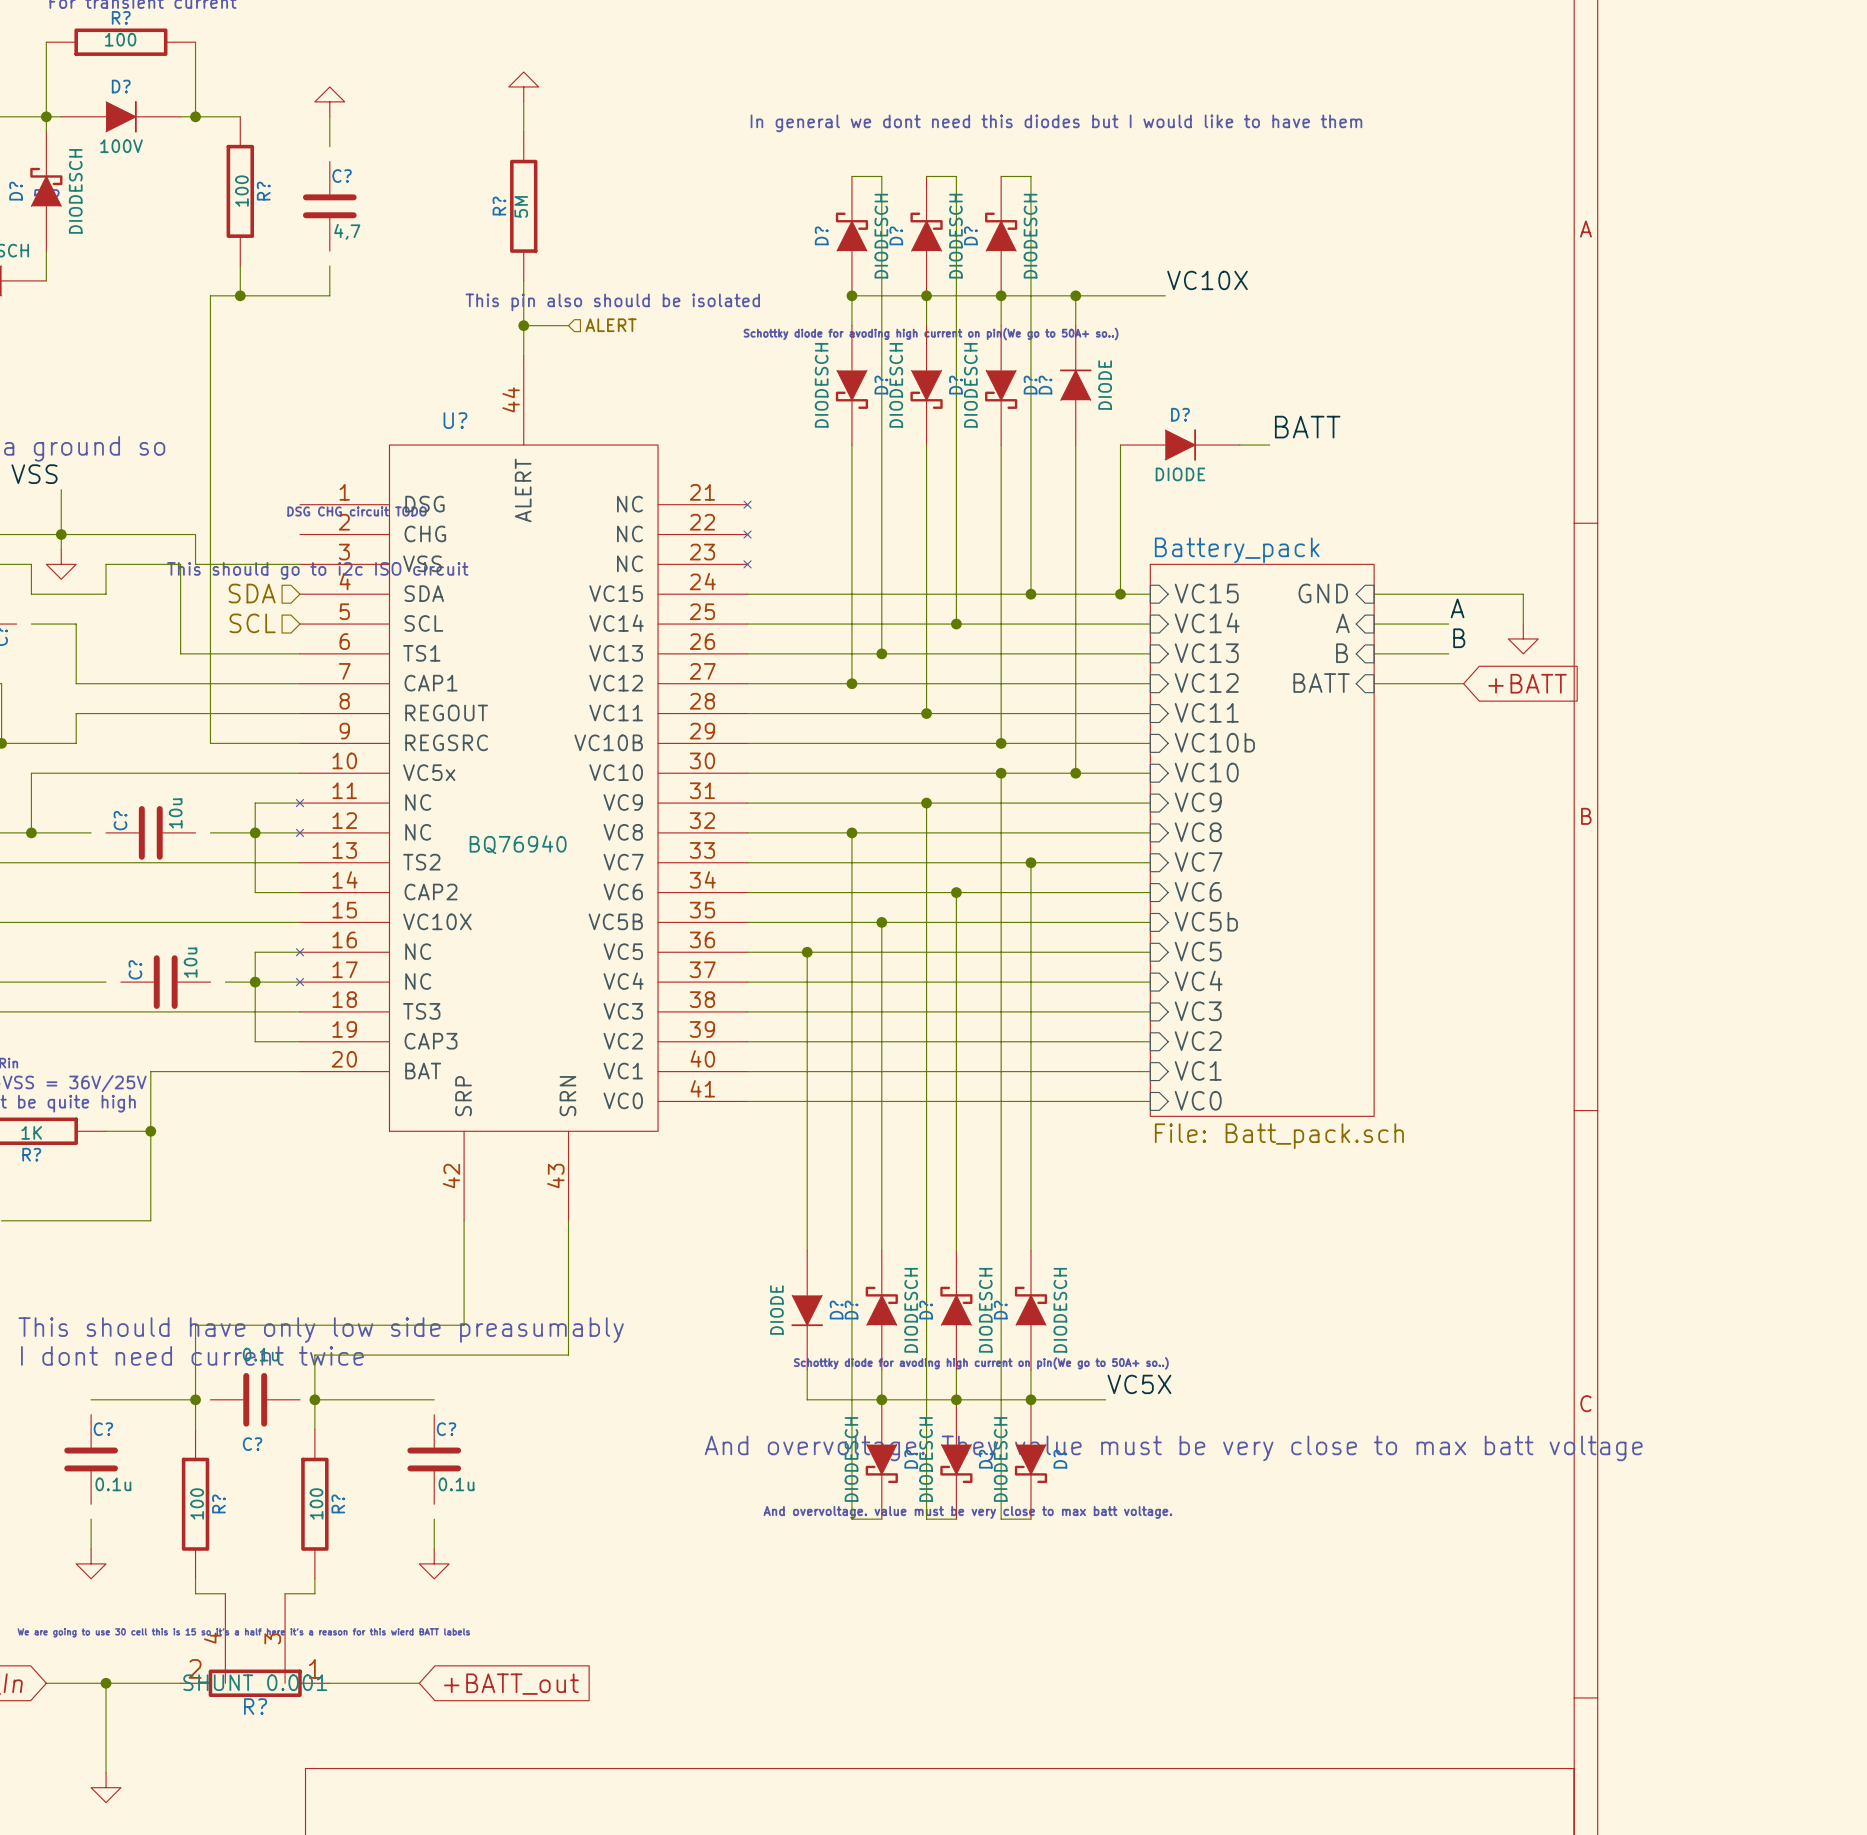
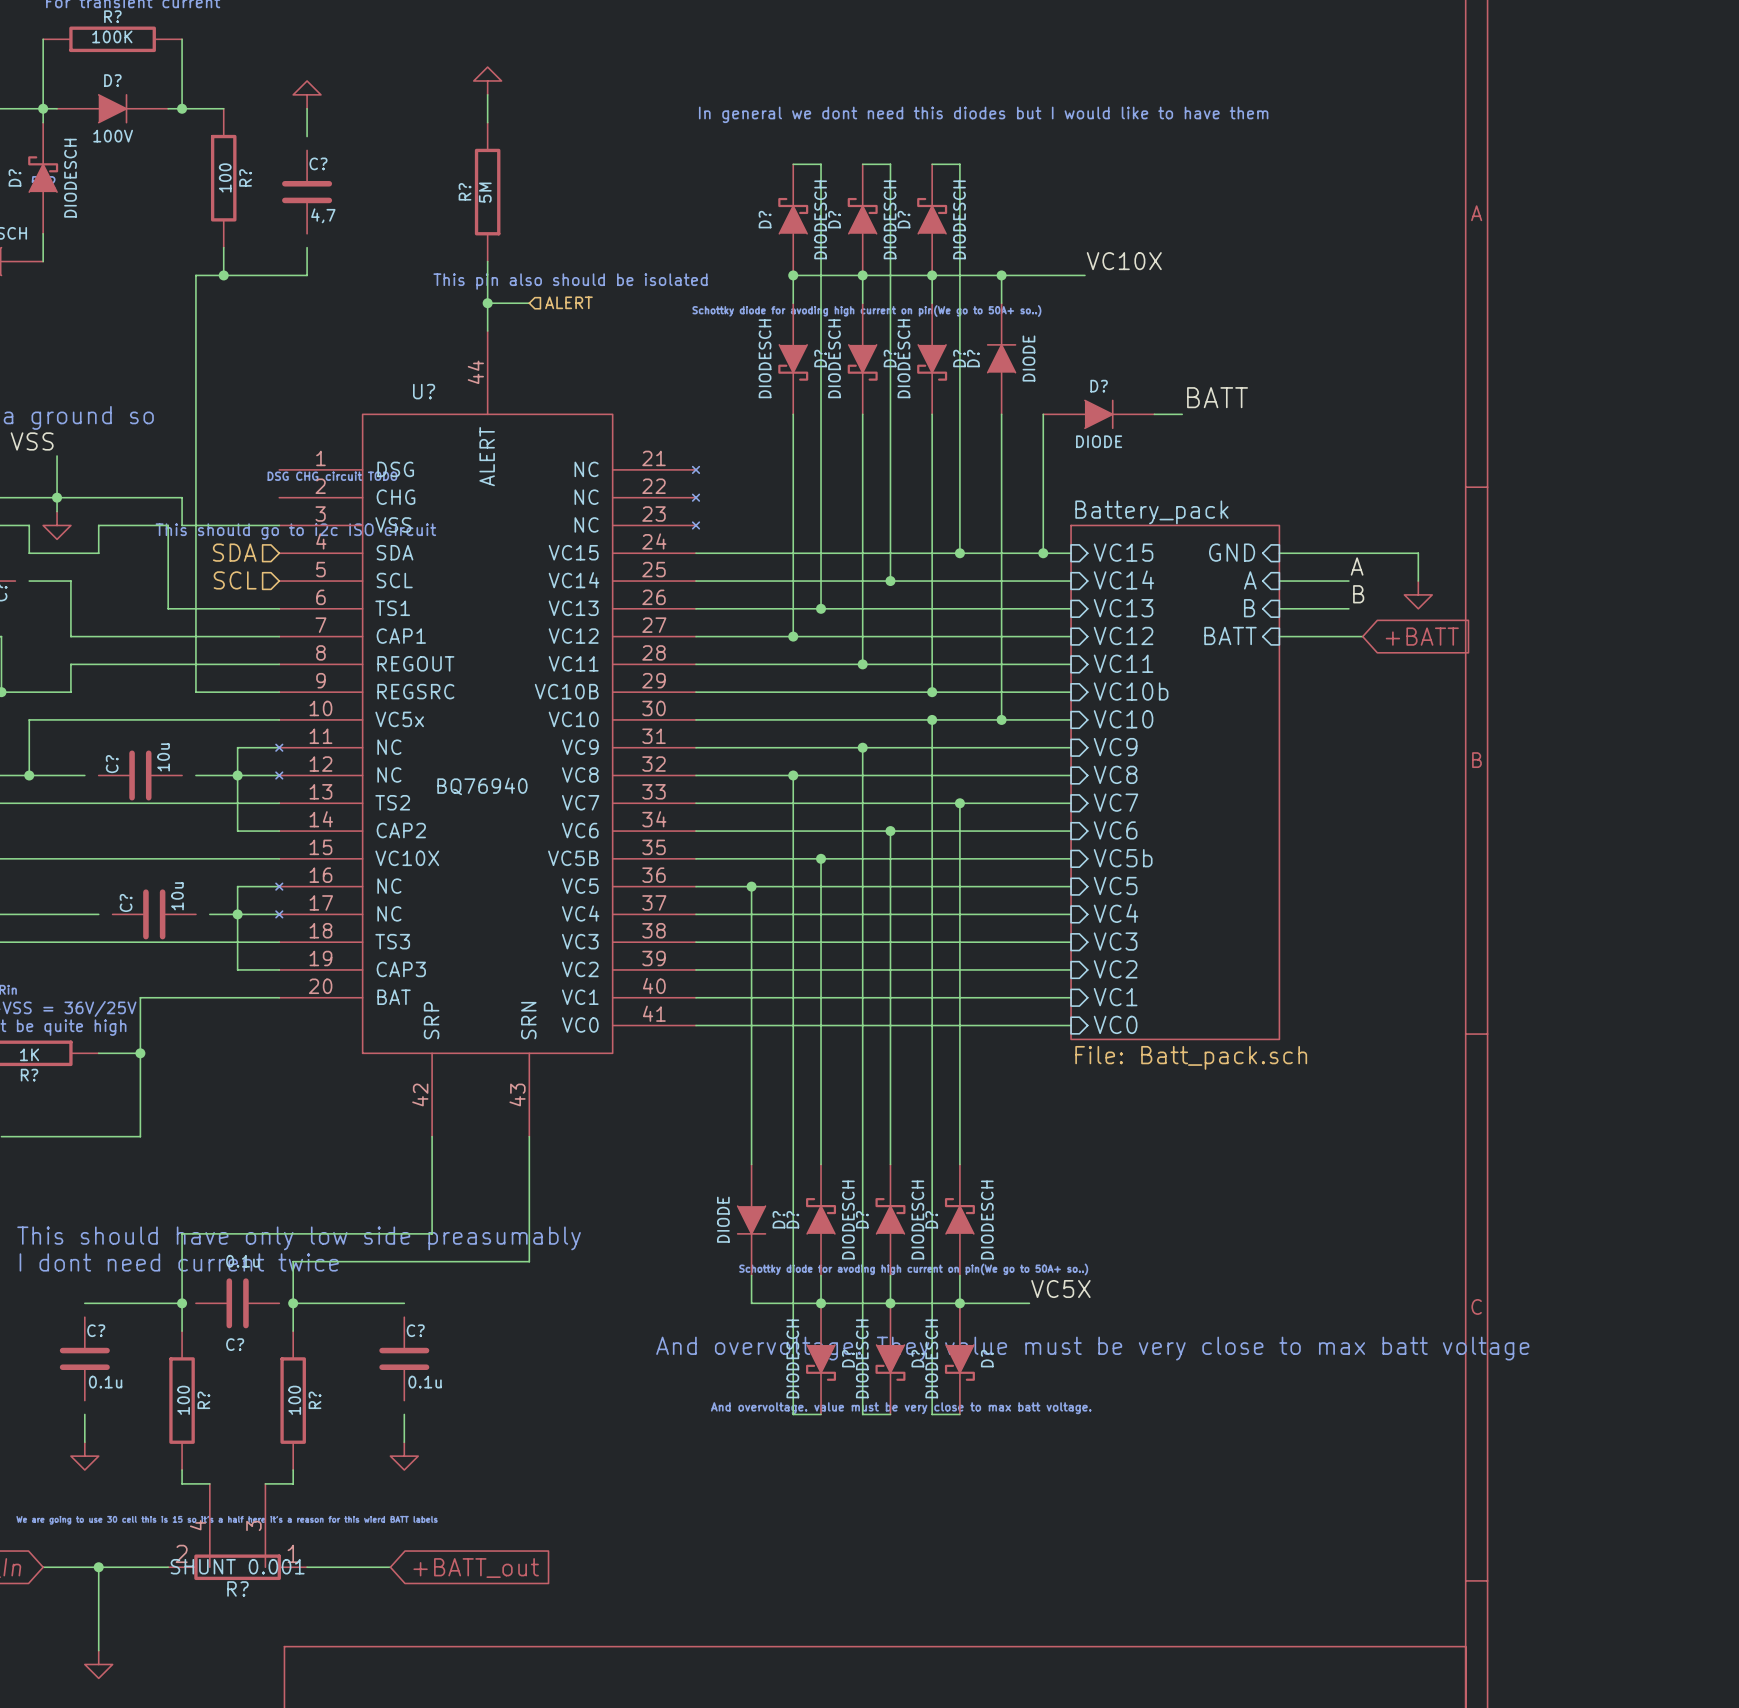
R? value: 100 (120, 39) -> 100K (112, 36)

